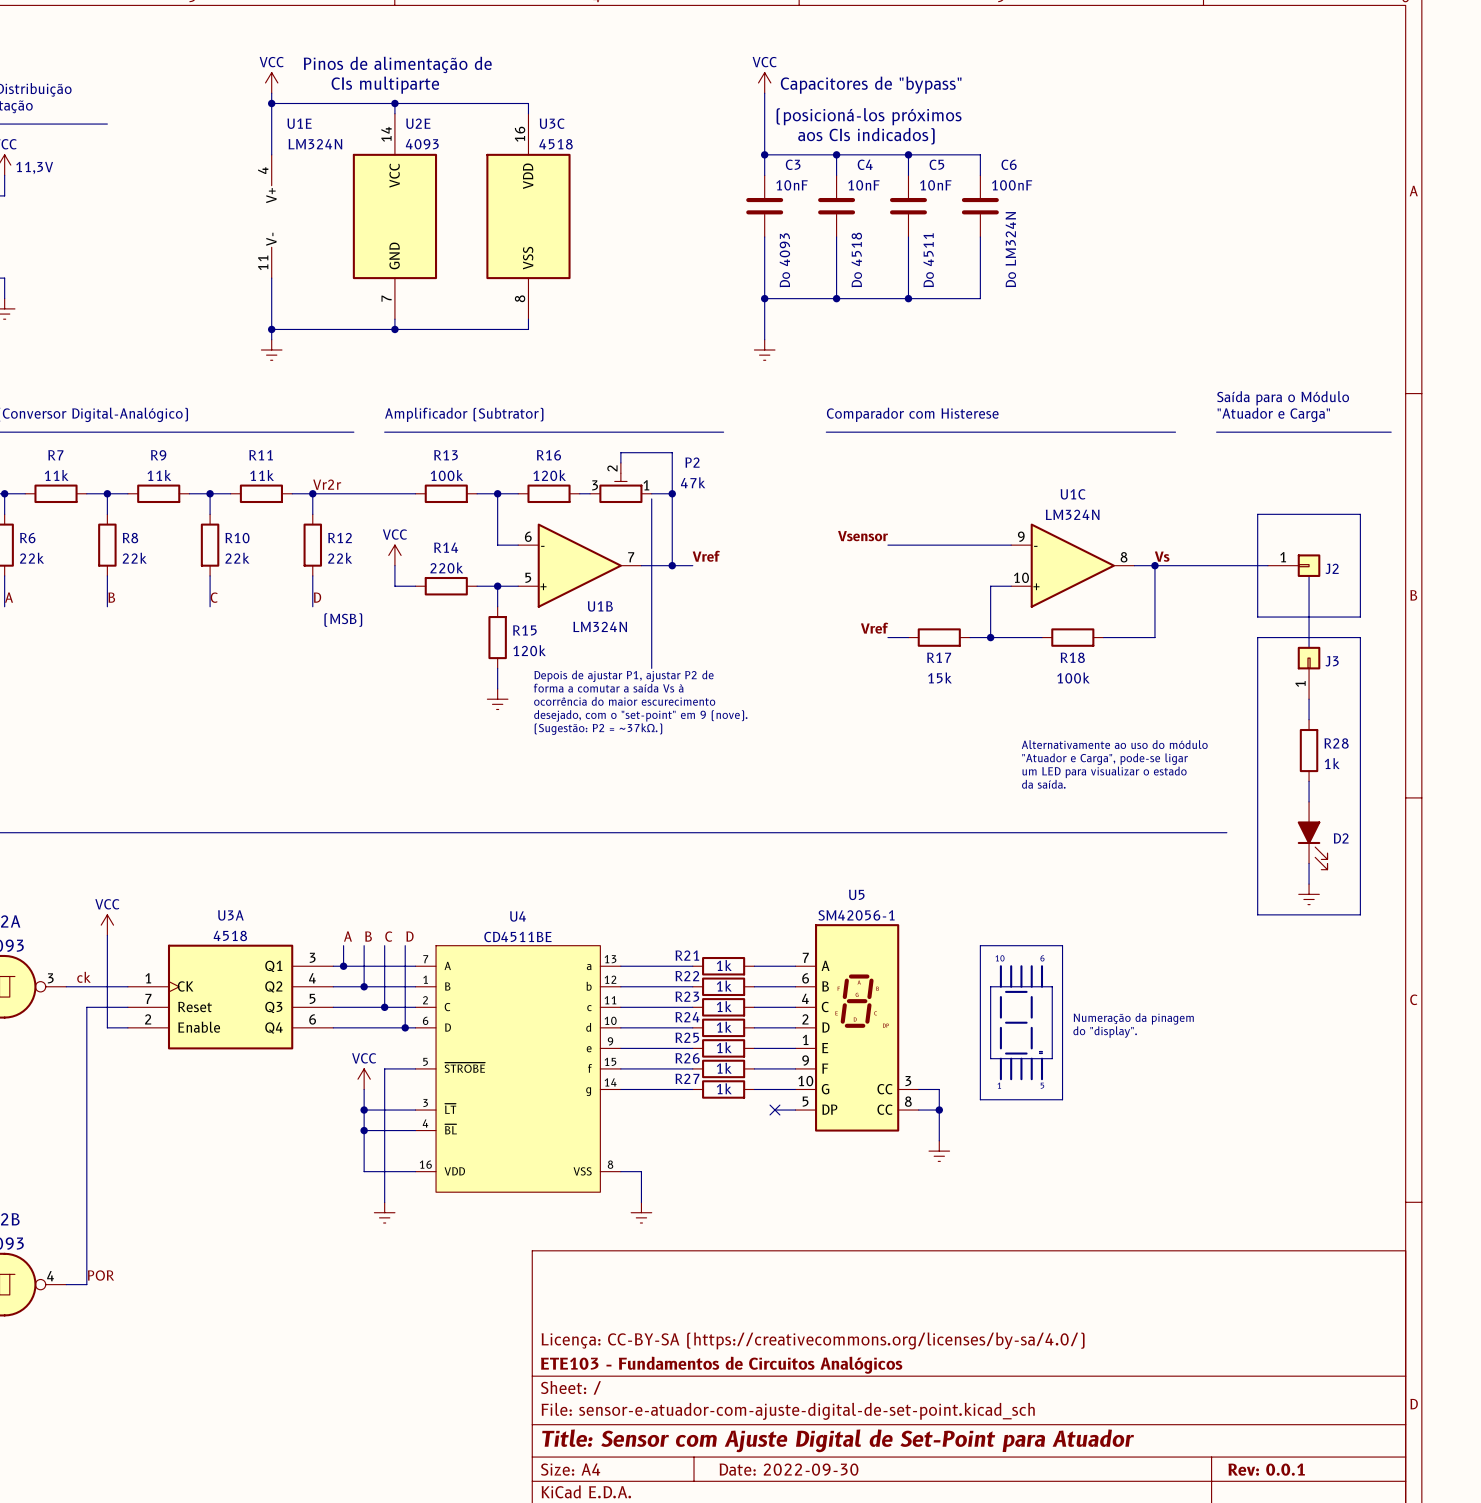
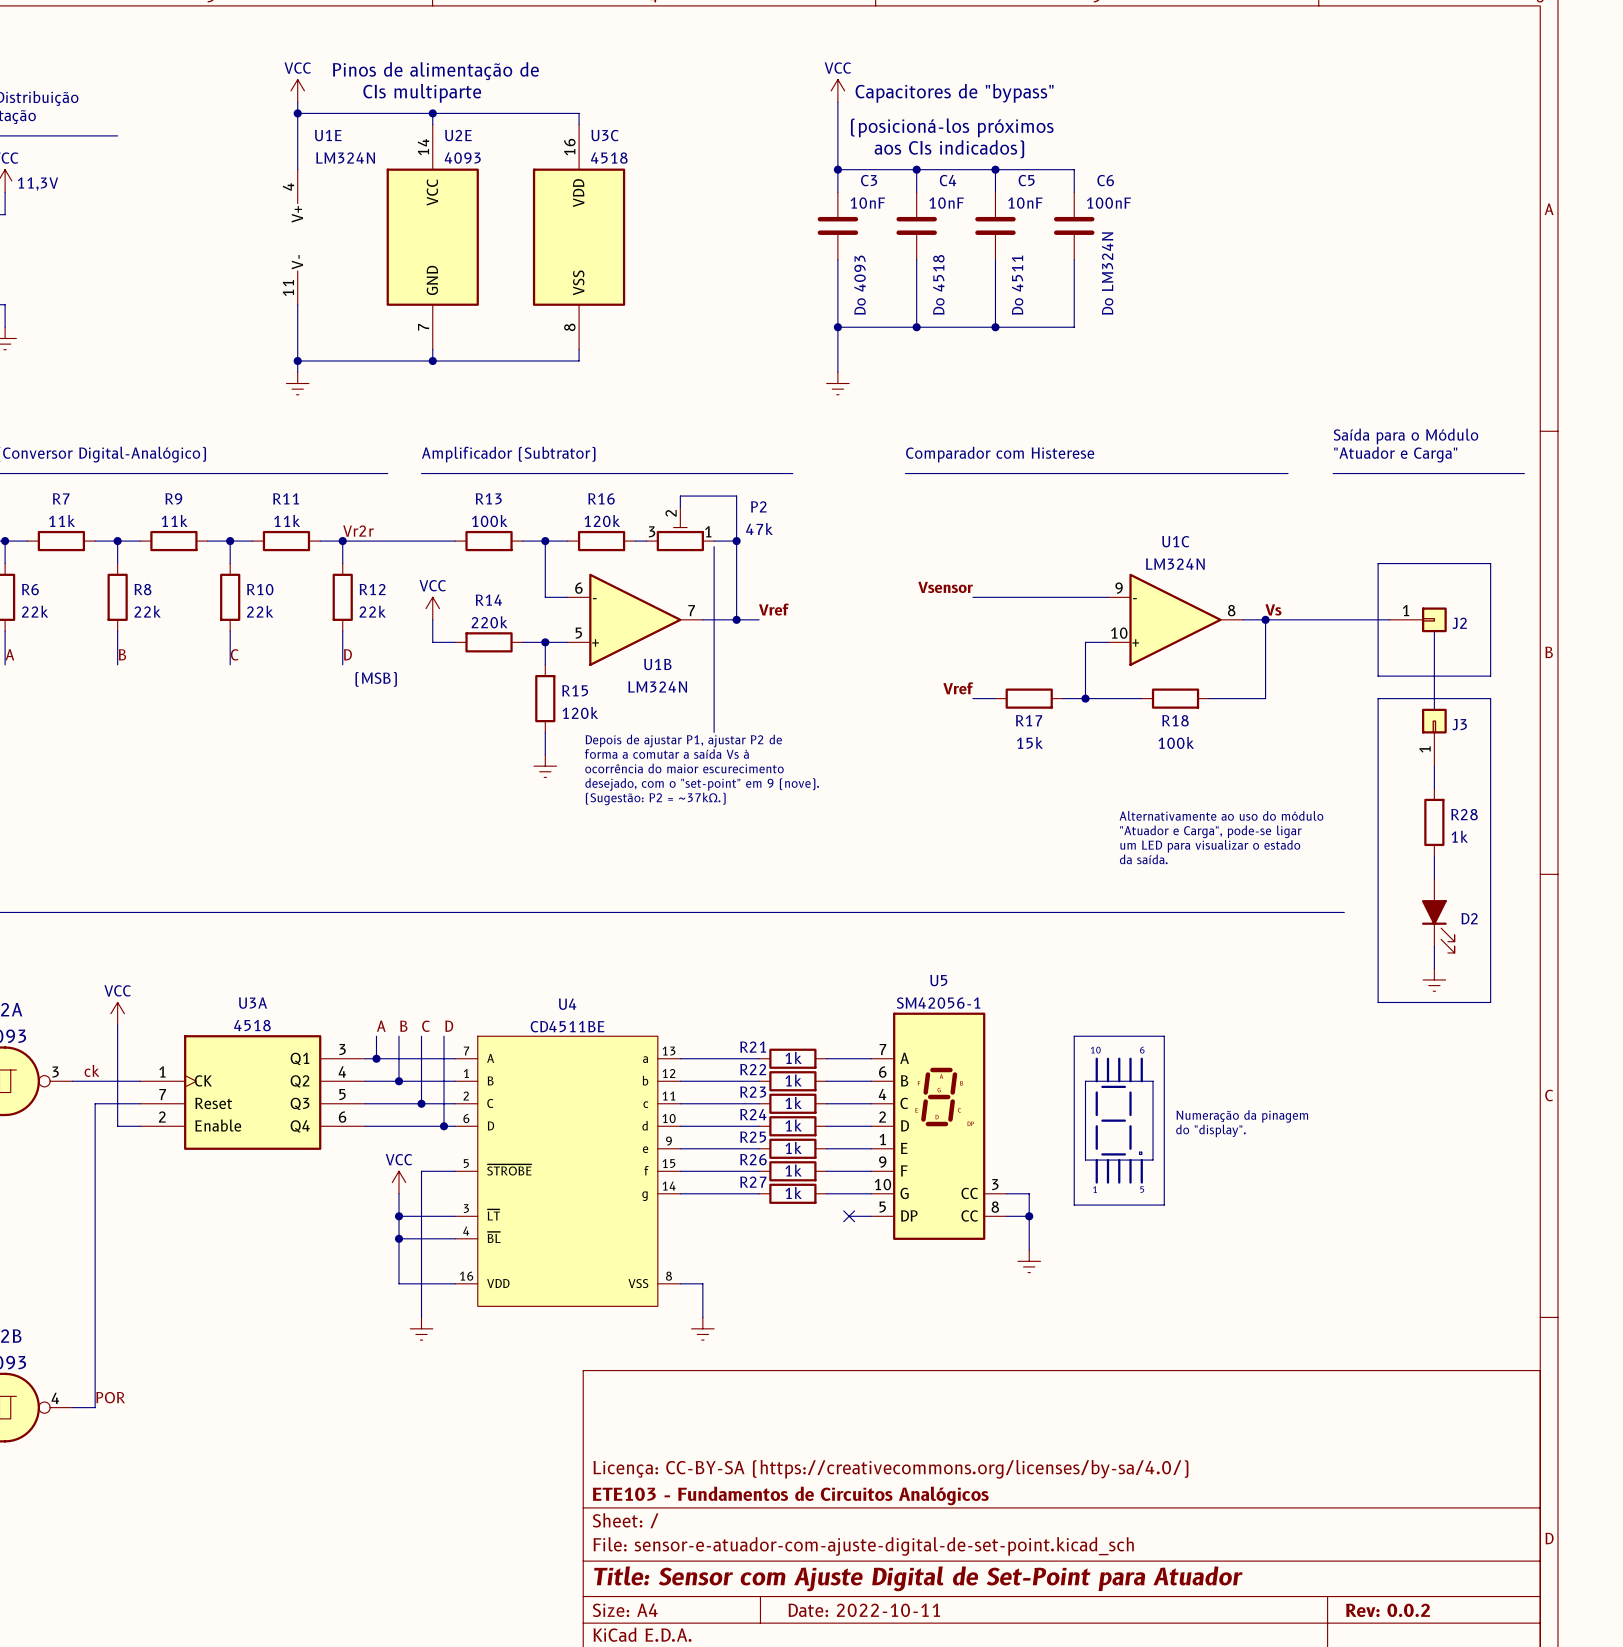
title block: Date: 2022-09-30 (789, 1469) -> Date: 2022-10-11 (864, 1610)
title block: Rev: 0.0.1 (1266, 1469) -> Rev: 0.0.2 (1387, 1610)

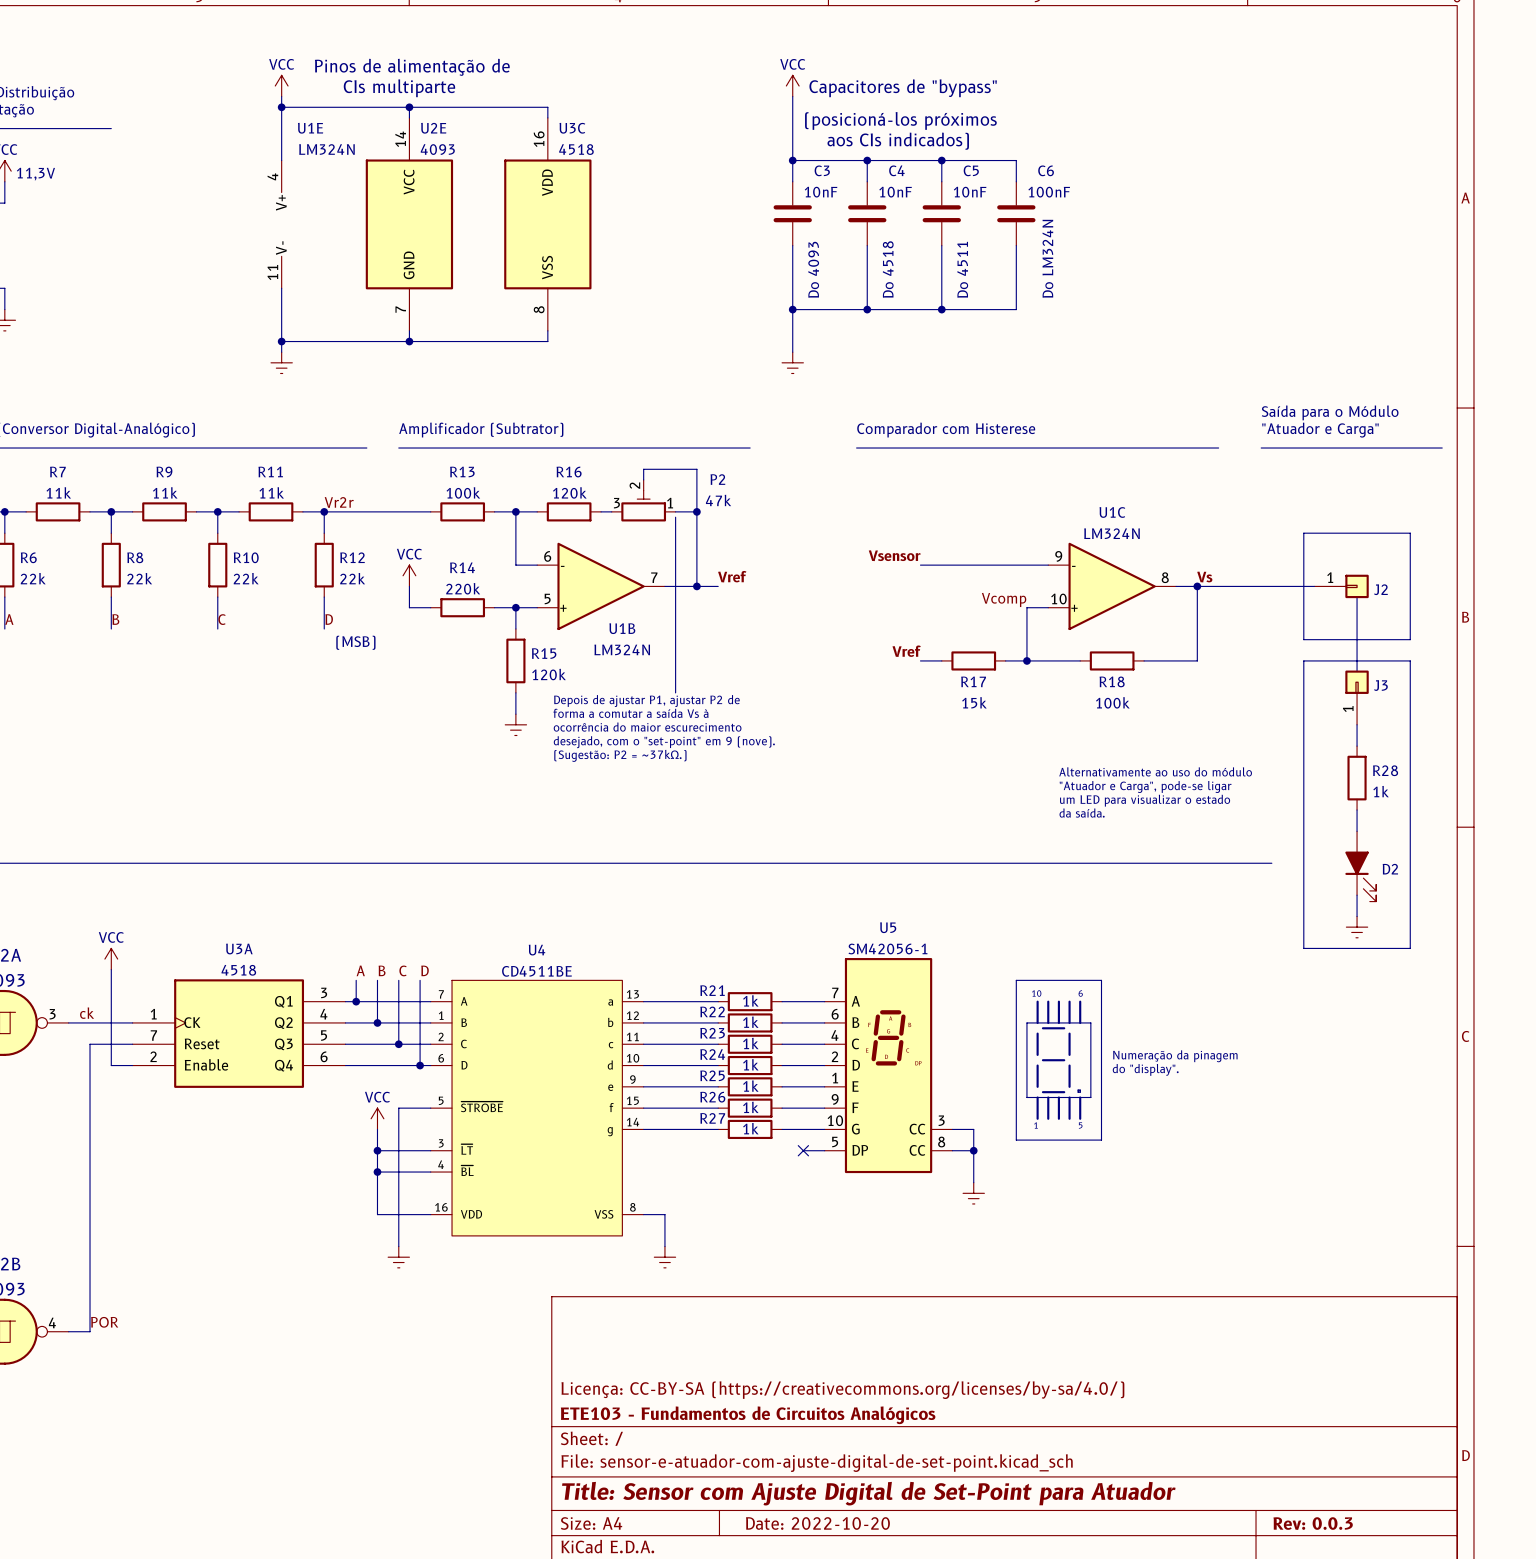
label: none -> Vcomp (1004, 599)
title block: Date: 2022-10-11 (864, 1610) -> Date: 2022-10-20 (817, 1523)
title block: Rev: 0.0.2 (1387, 1610) -> Rev: 0.0.3 (1313, 1523)

